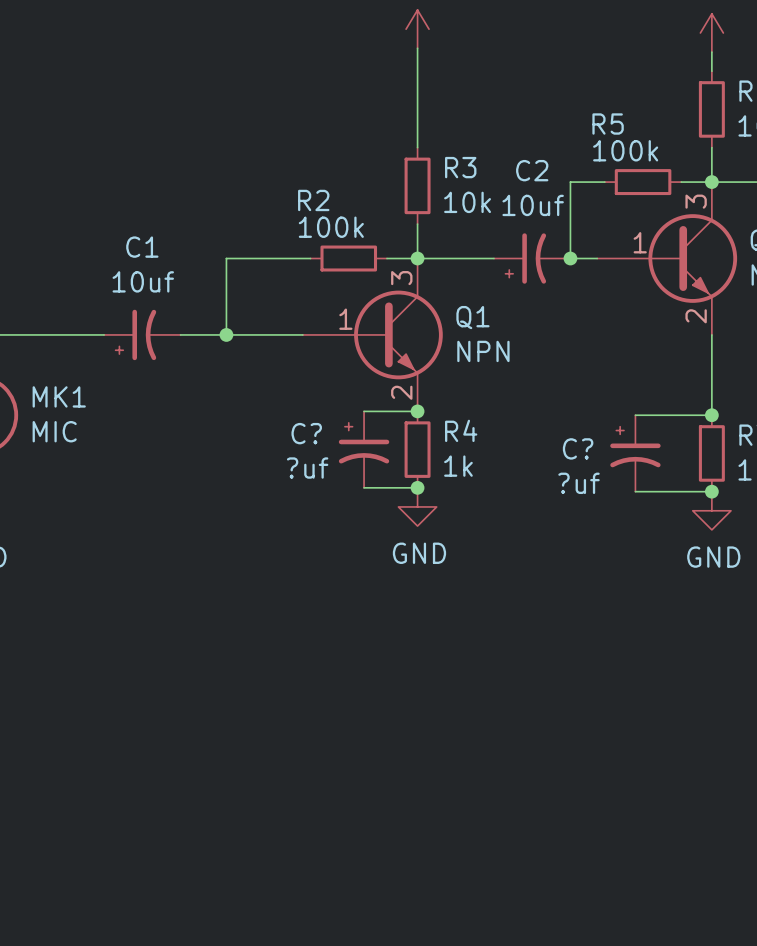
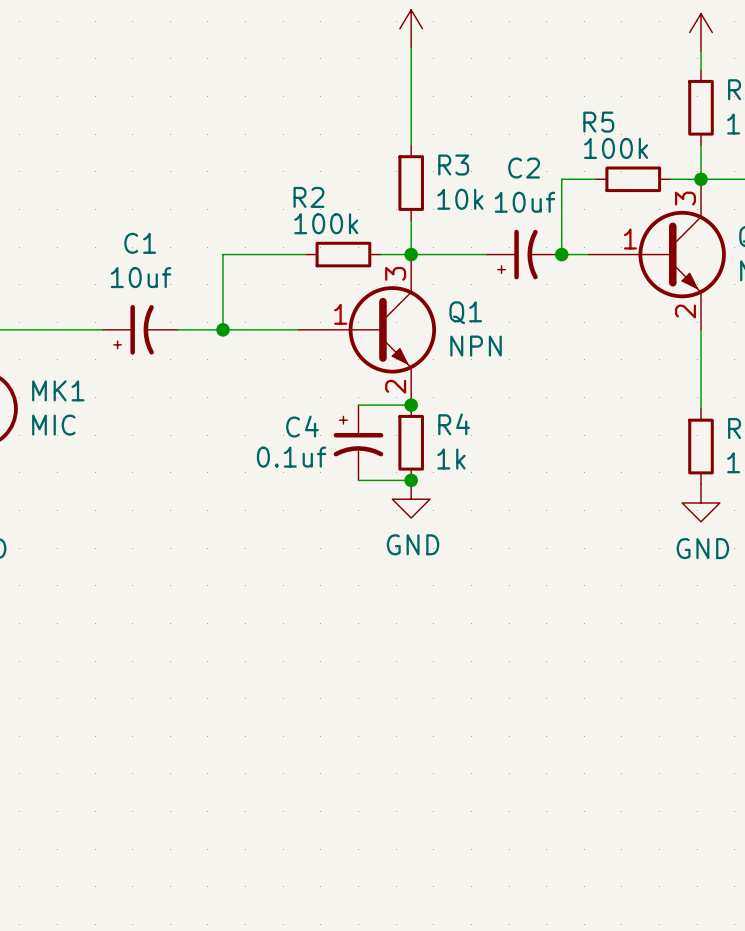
wire: (635, 415) (711, 415) -> none
junction: (711, 415) -> none
C? name: C? (306, 433) -> C4 (302, 426)
C?: ?uf (635, 453) -> none
C? value: ?uf (307, 468) -> 0.1uf (291, 457)
wire: (635, 491) (711, 491) -> none
junction: (711, 491) -> none

